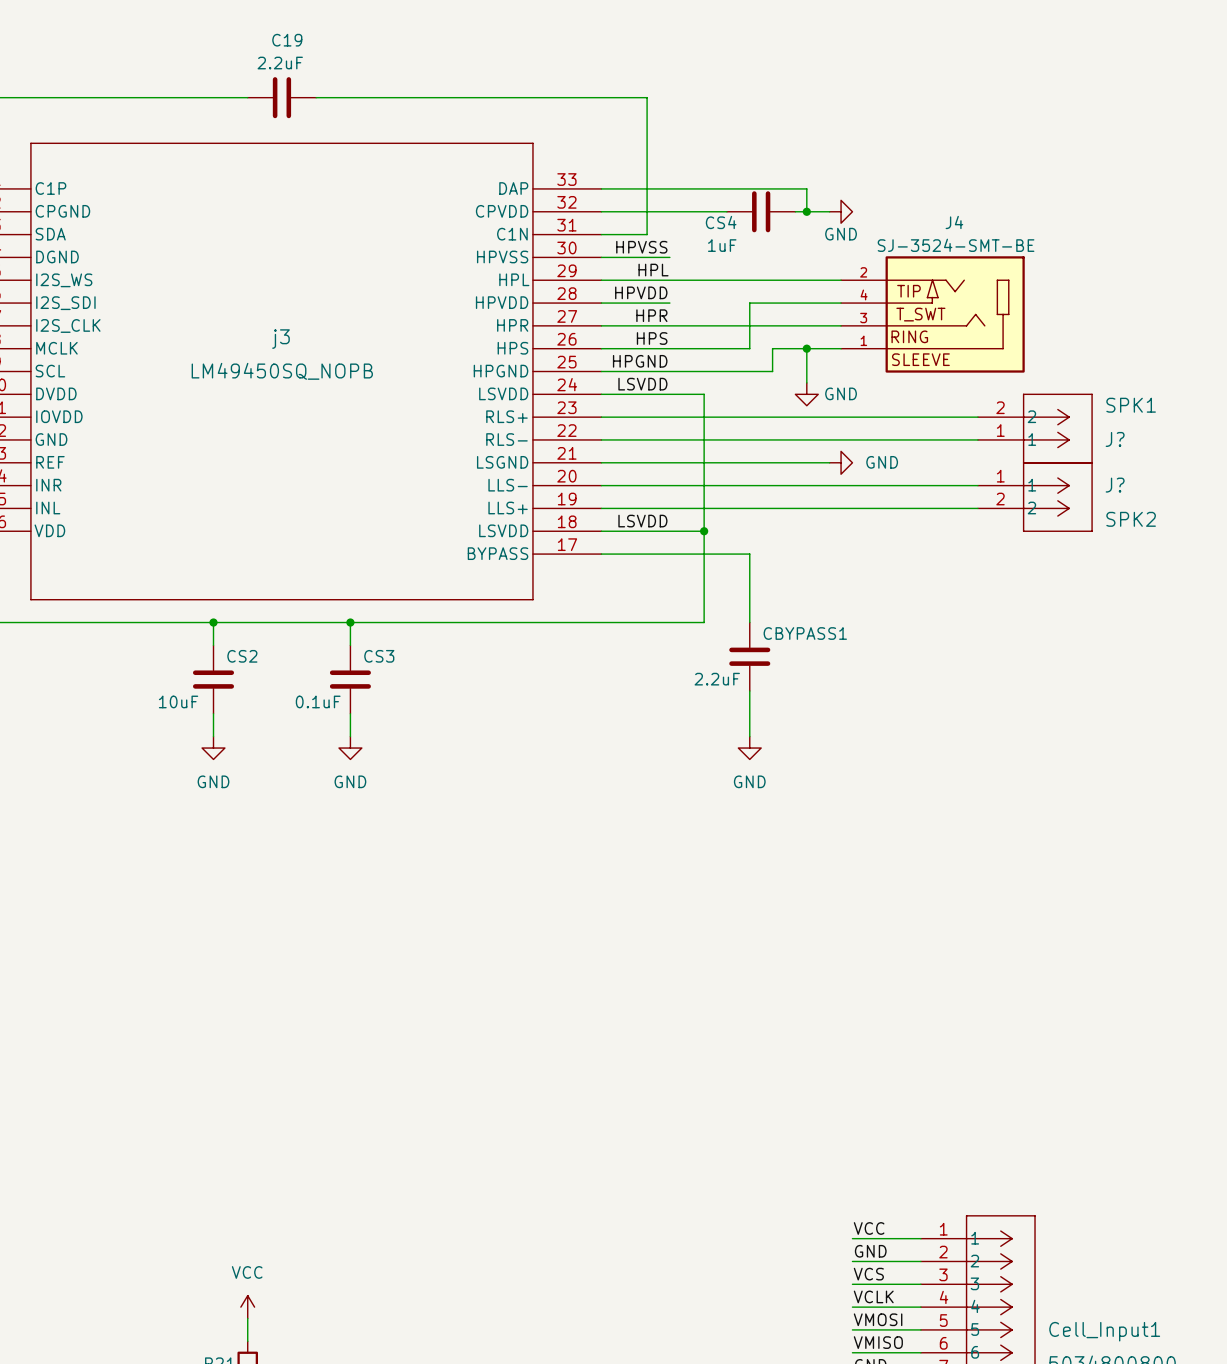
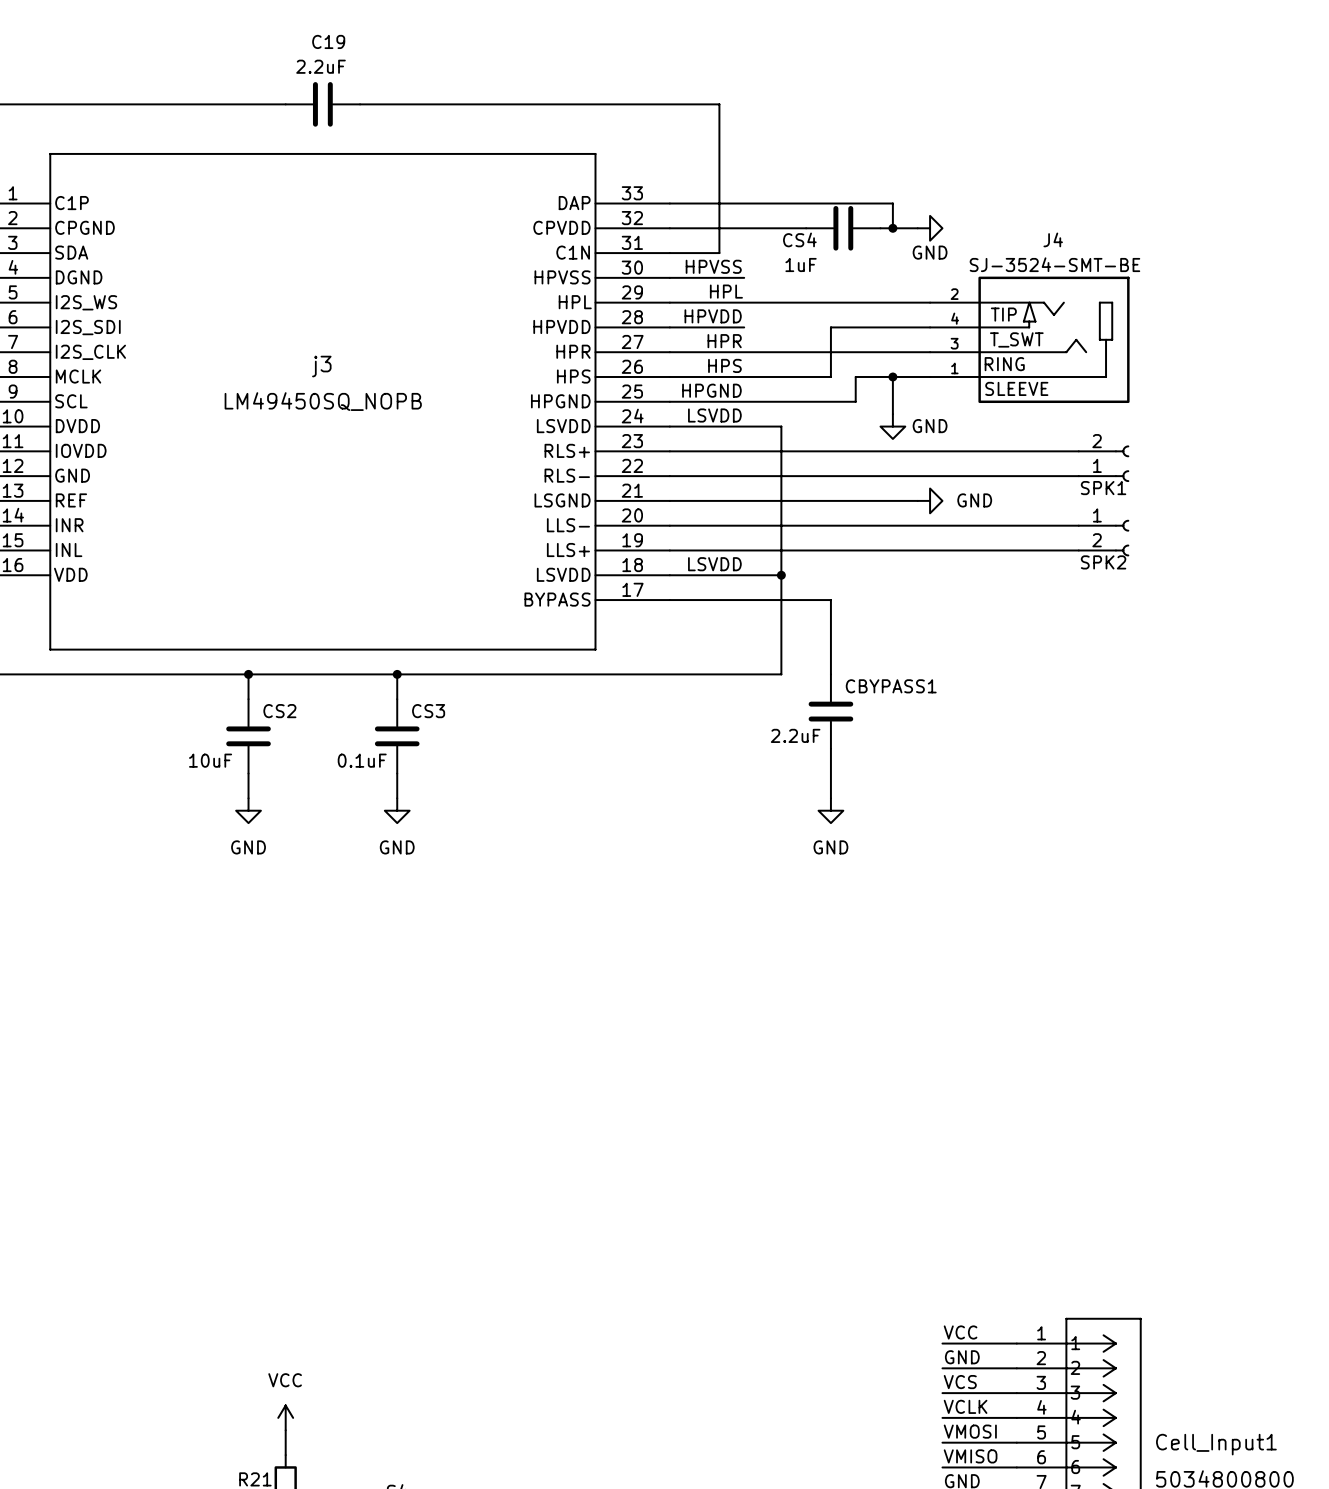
SPK1: none -> (1103, 463)
J?: SPK1 (1035, 428) -> none
SPK2: none -> (1103, 538)
J?: SPK2 (1035, 497) -> none

